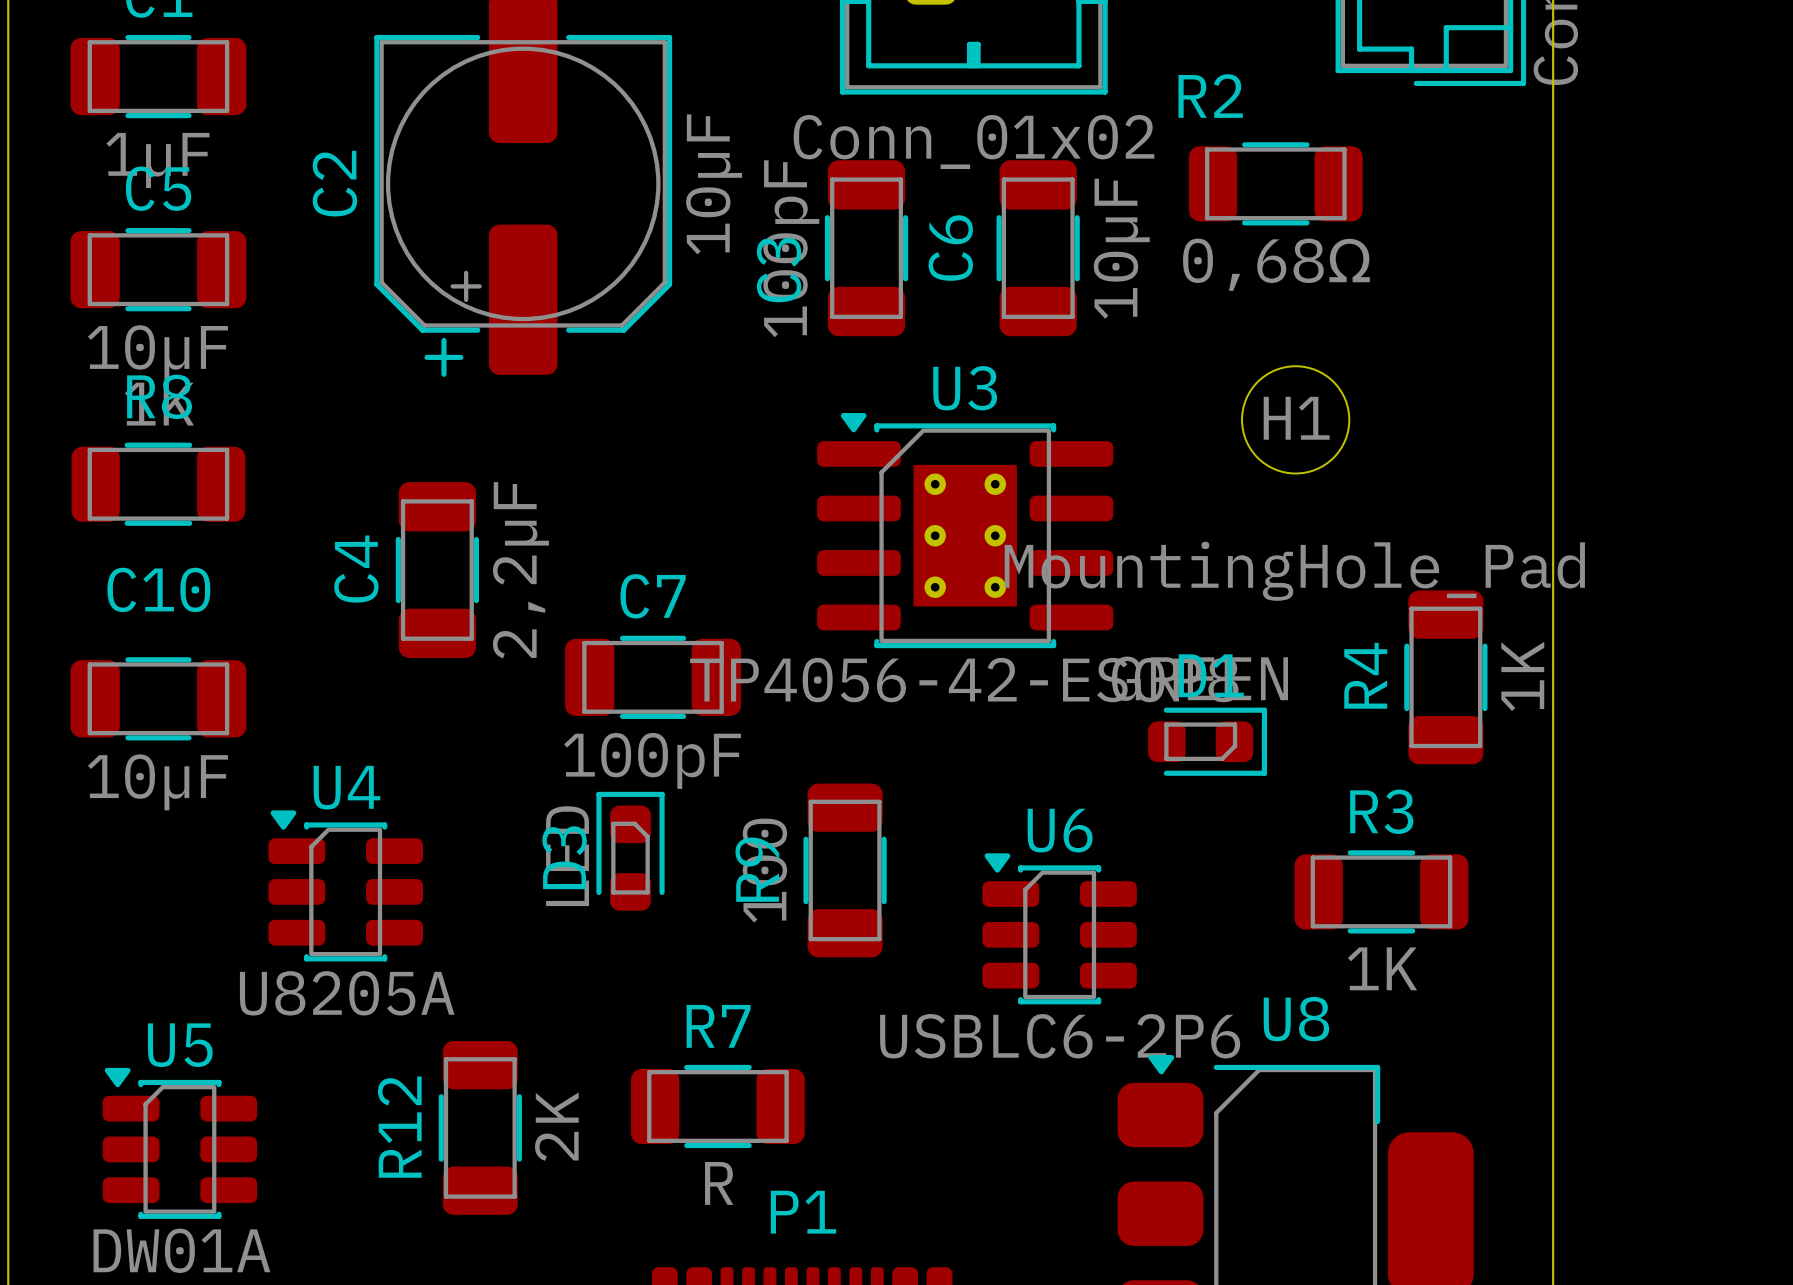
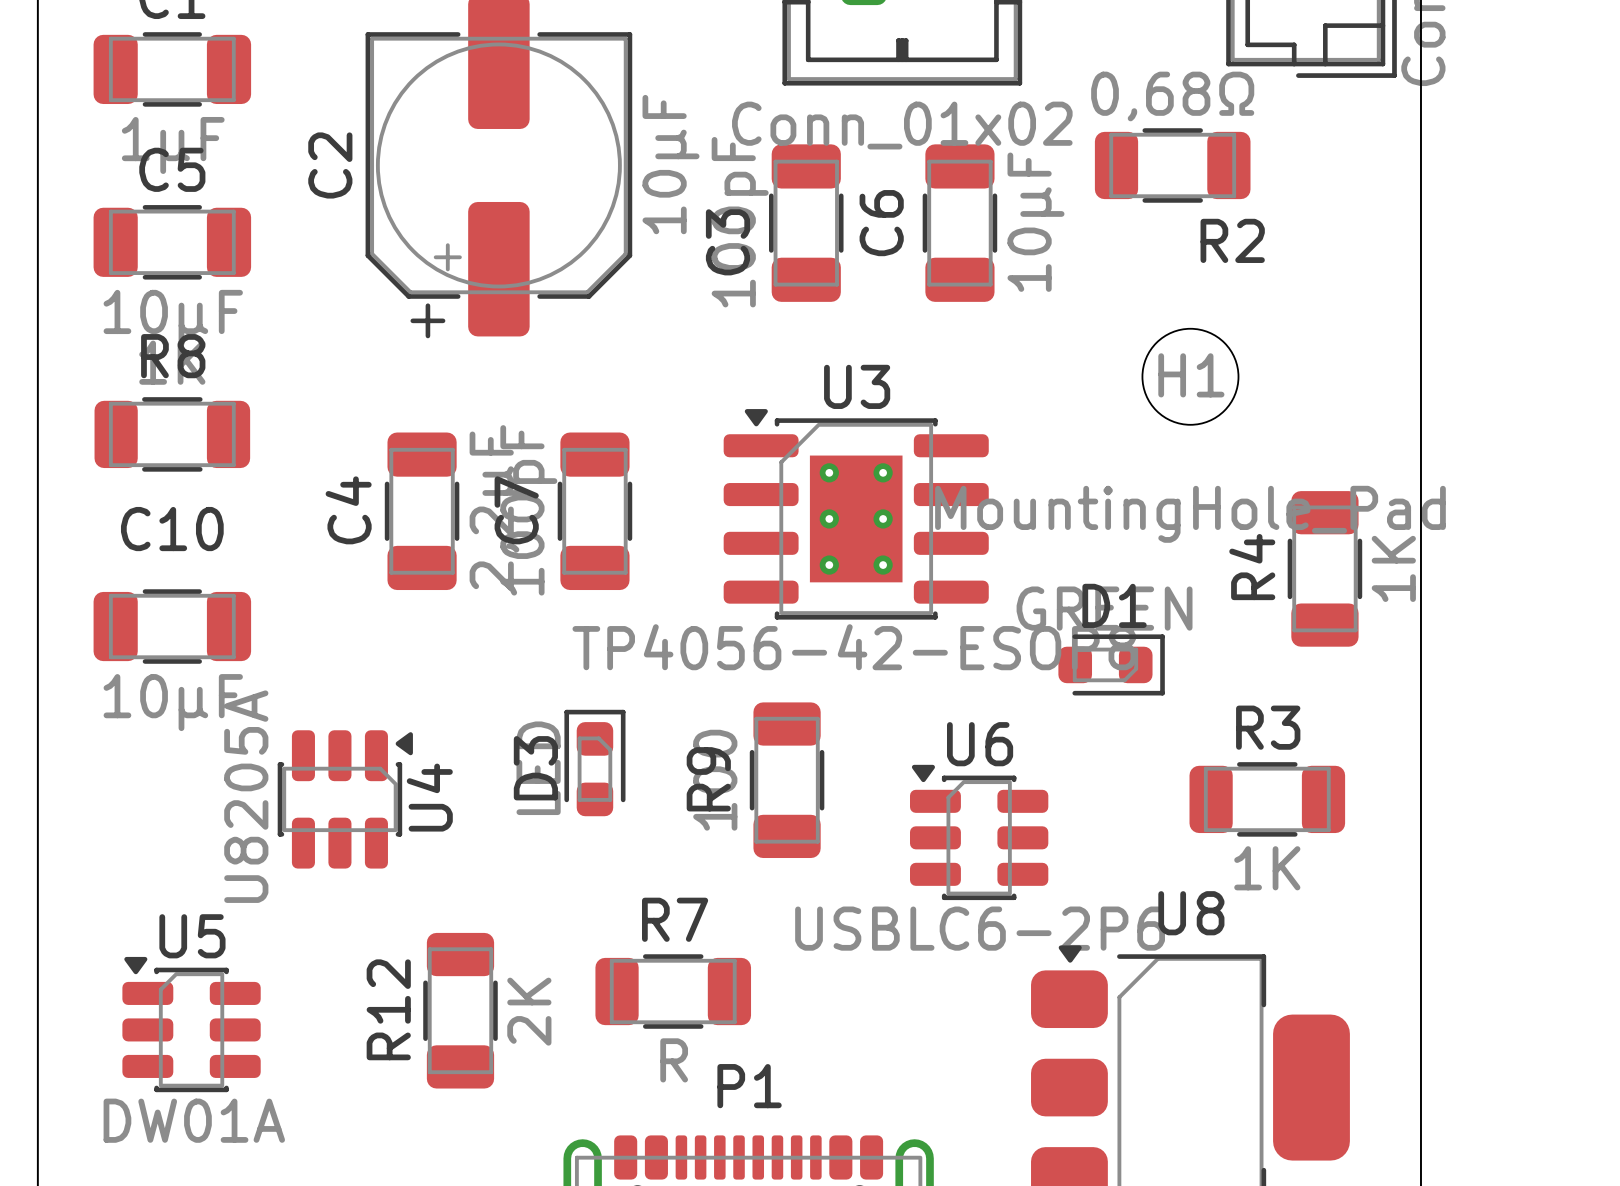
R2 name position: R2 (1210, 96) -> R2 (1232, 240)
R2 value position: 0,68Ω (1276, 264) -> 0,68Ω (1172, 96)
U3 position: (965, 530) -> (856, 514)
C7 name position: C7 (653, 596) -> C7 (516, 510)
C7 rotation: 0° (653, 677) -> 90° clockwise (594, 511)
C7 position: (653, 677) -> (594, 511)
R4 position: (1445, 677) -> (1324, 568)
U4 rotation: 0° (345, 885) -> 90° clockwise (345, 799)

